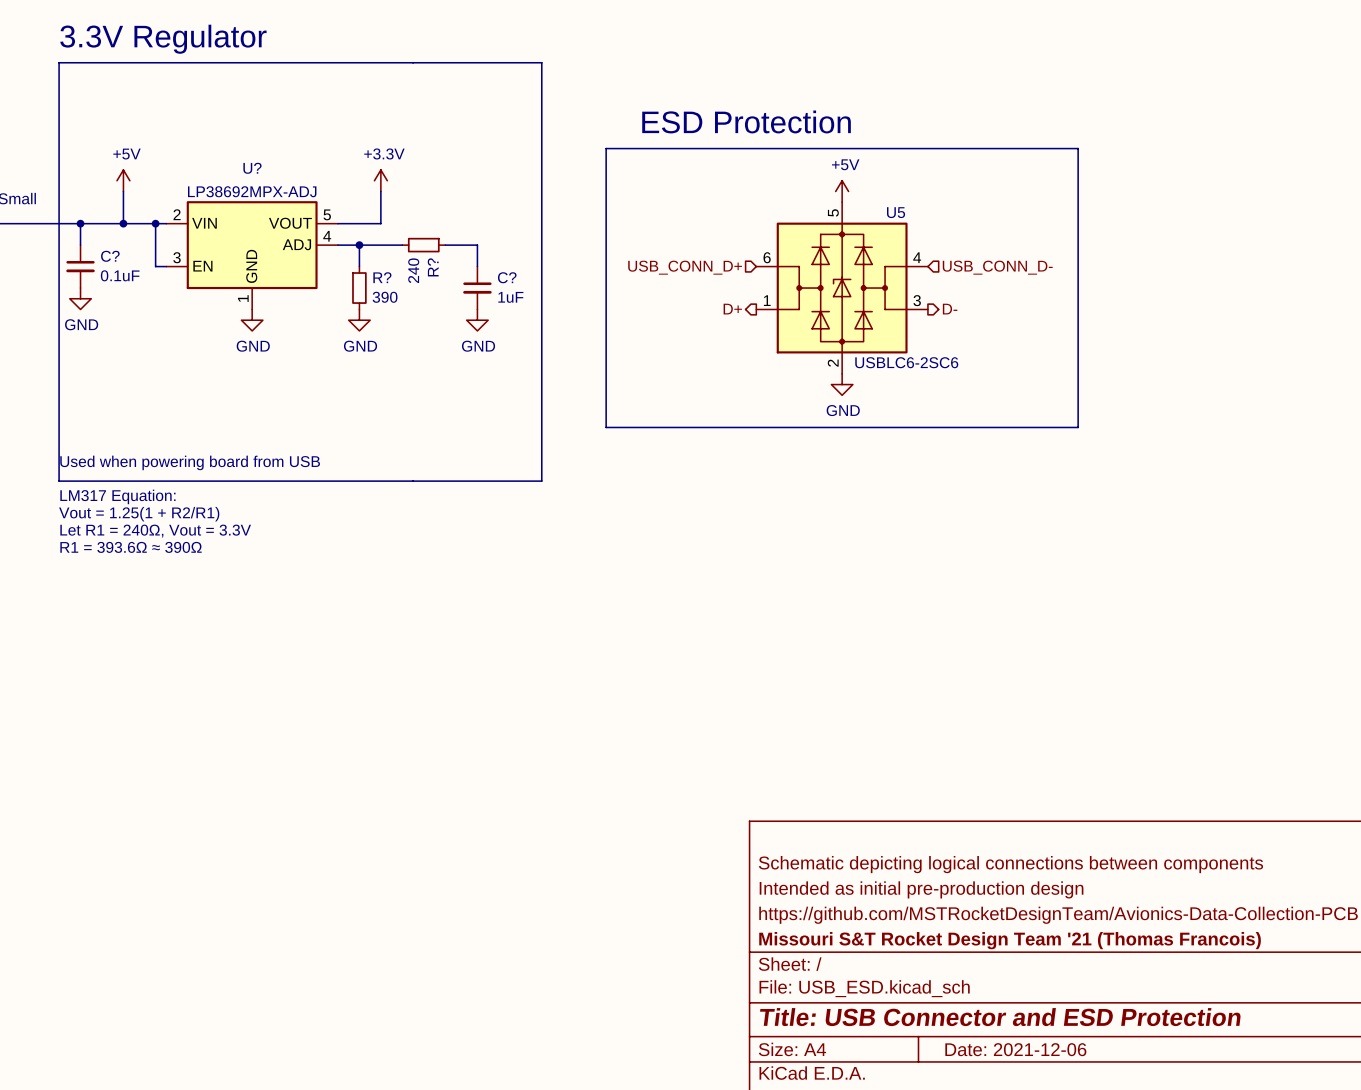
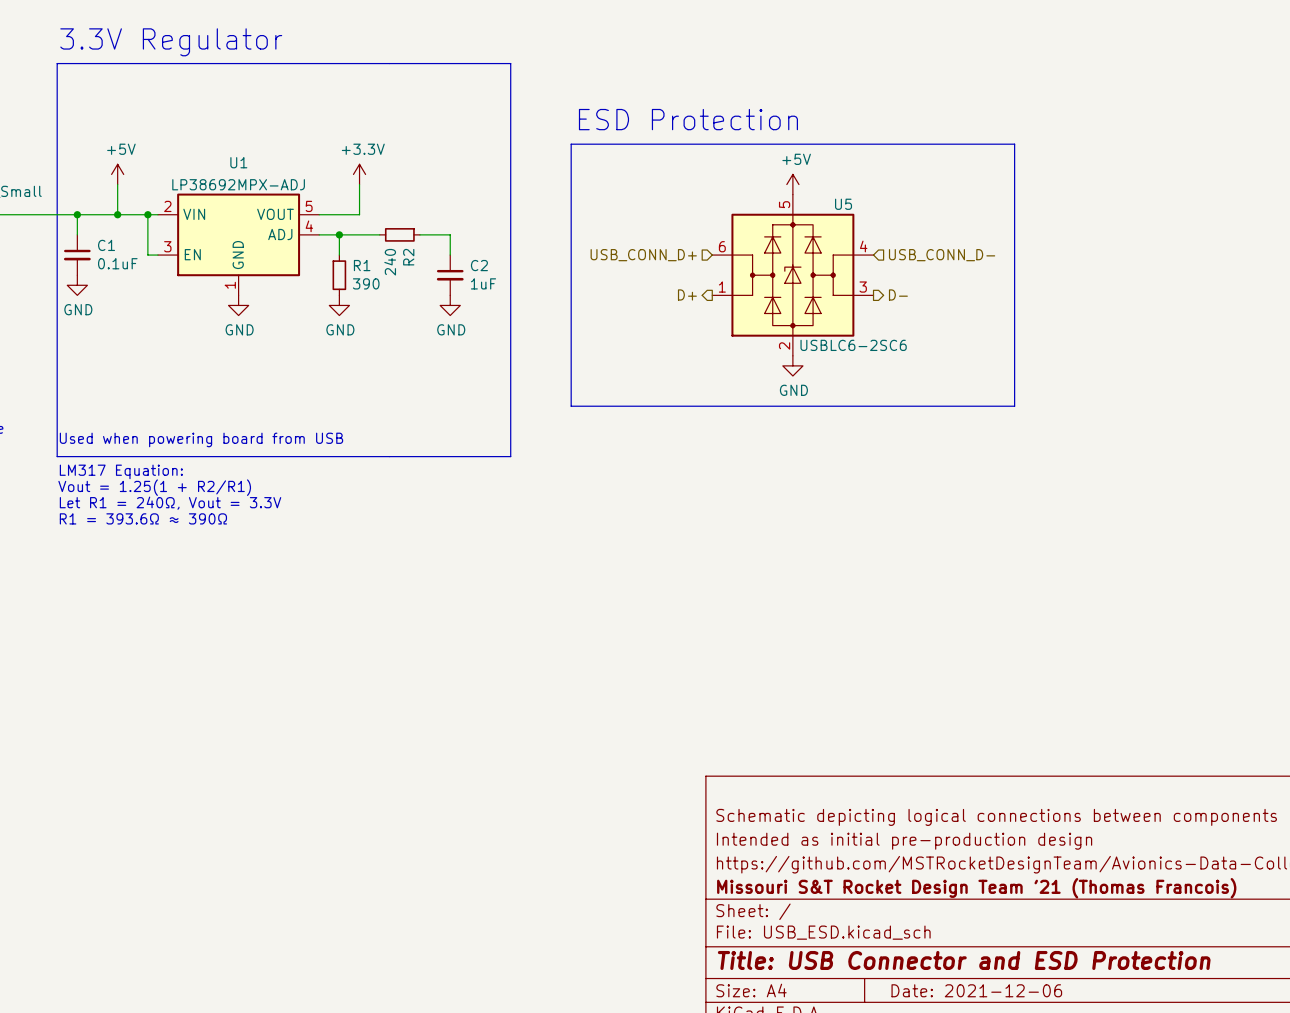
U? name: U? (252, 168) -> U1 (238, 162)
C? name: C? (110, 256) -> C1 (106, 245)
R? name: R? (433, 267) -> R2 (408, 257)
R? name: R? (382, 277) -> R1 (362, 265)
C? name: C? (507, 277) -> C2 (479, 265)

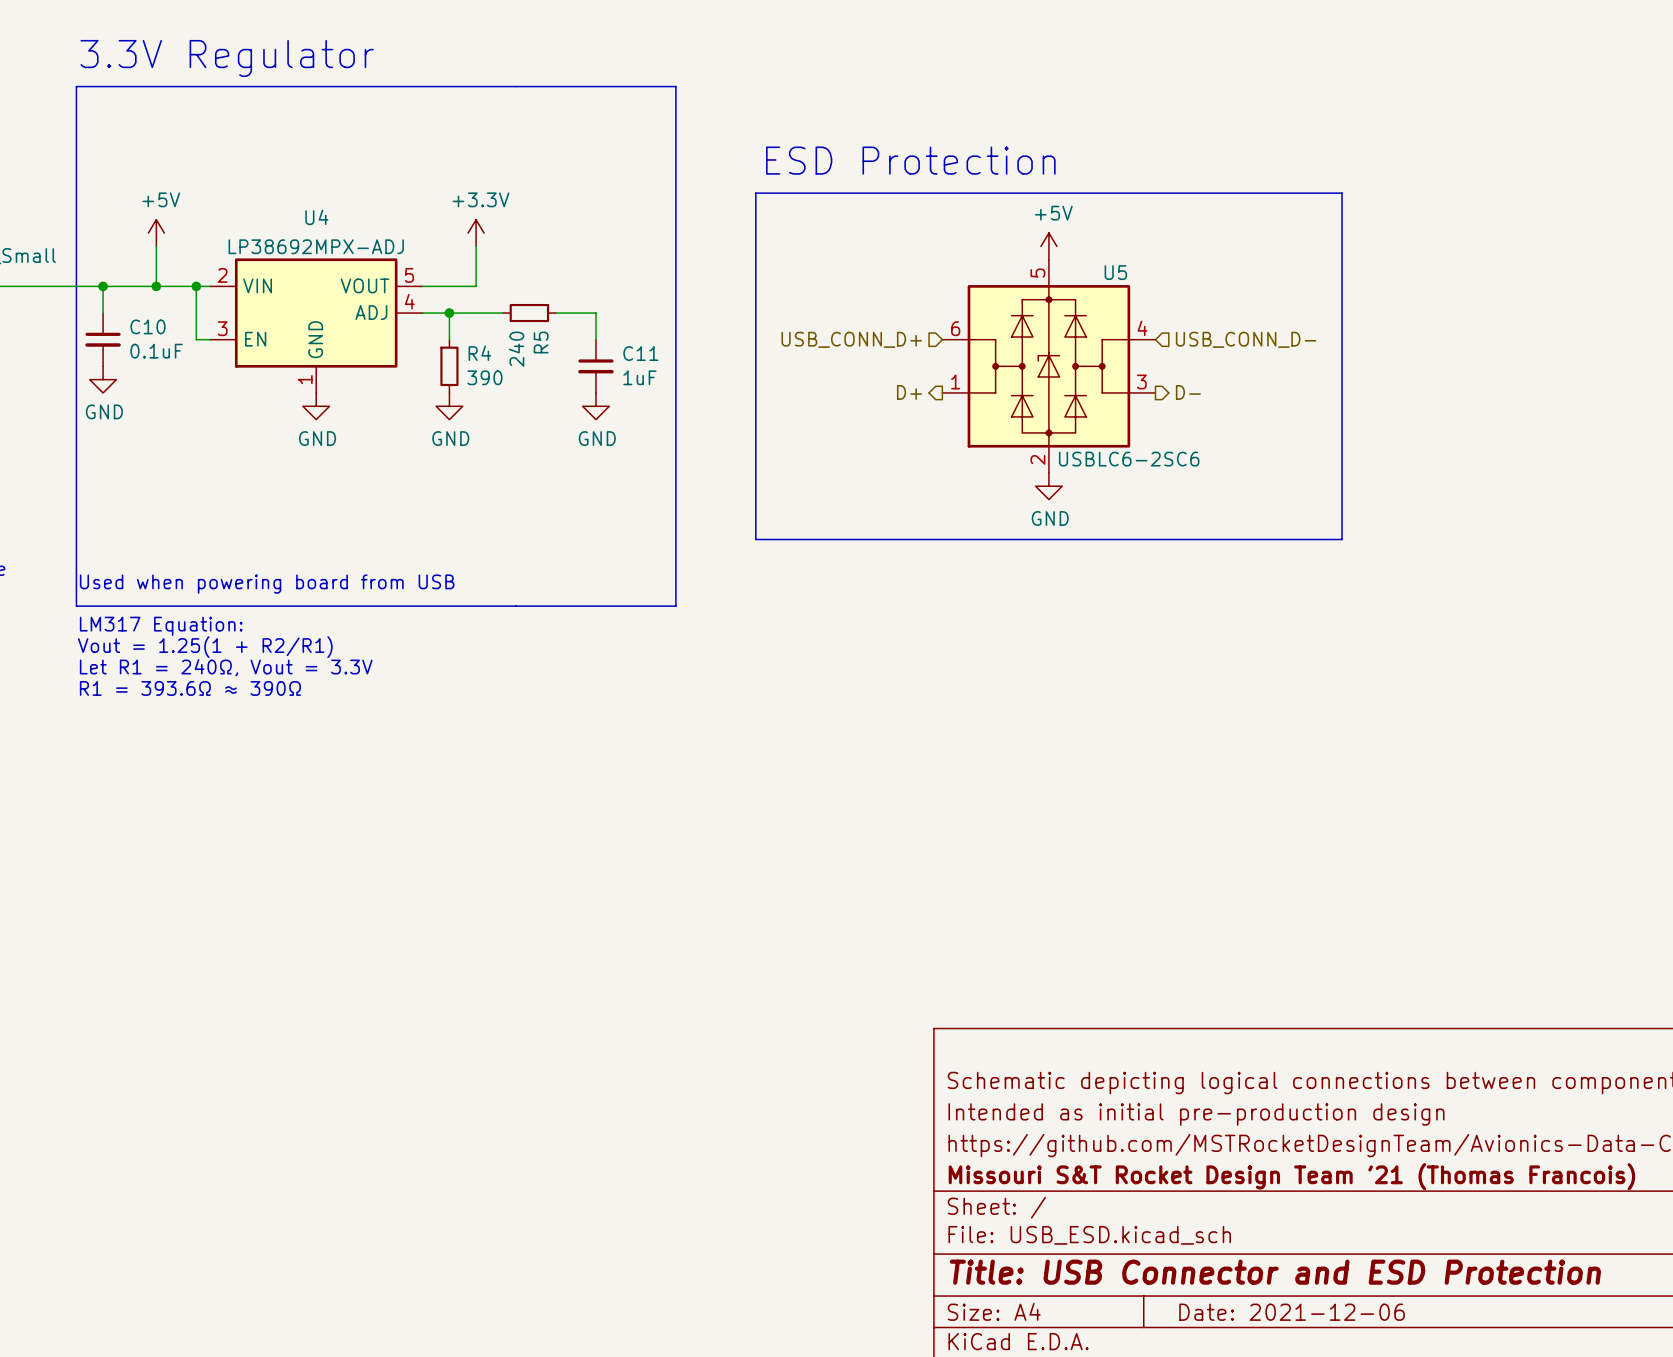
U1 name: U1 (238, 162) -> U4 (316, 217)
C1 name: C1 (106, 245) -> C10 (147, 326)
R2 name: R2 (408, 257) -> R5 (541, 342)
R1 name: R1 (362, 265) -> R4 (479, 353)
C2 name: C2 (479, 265) -> C11 (640, 353)

